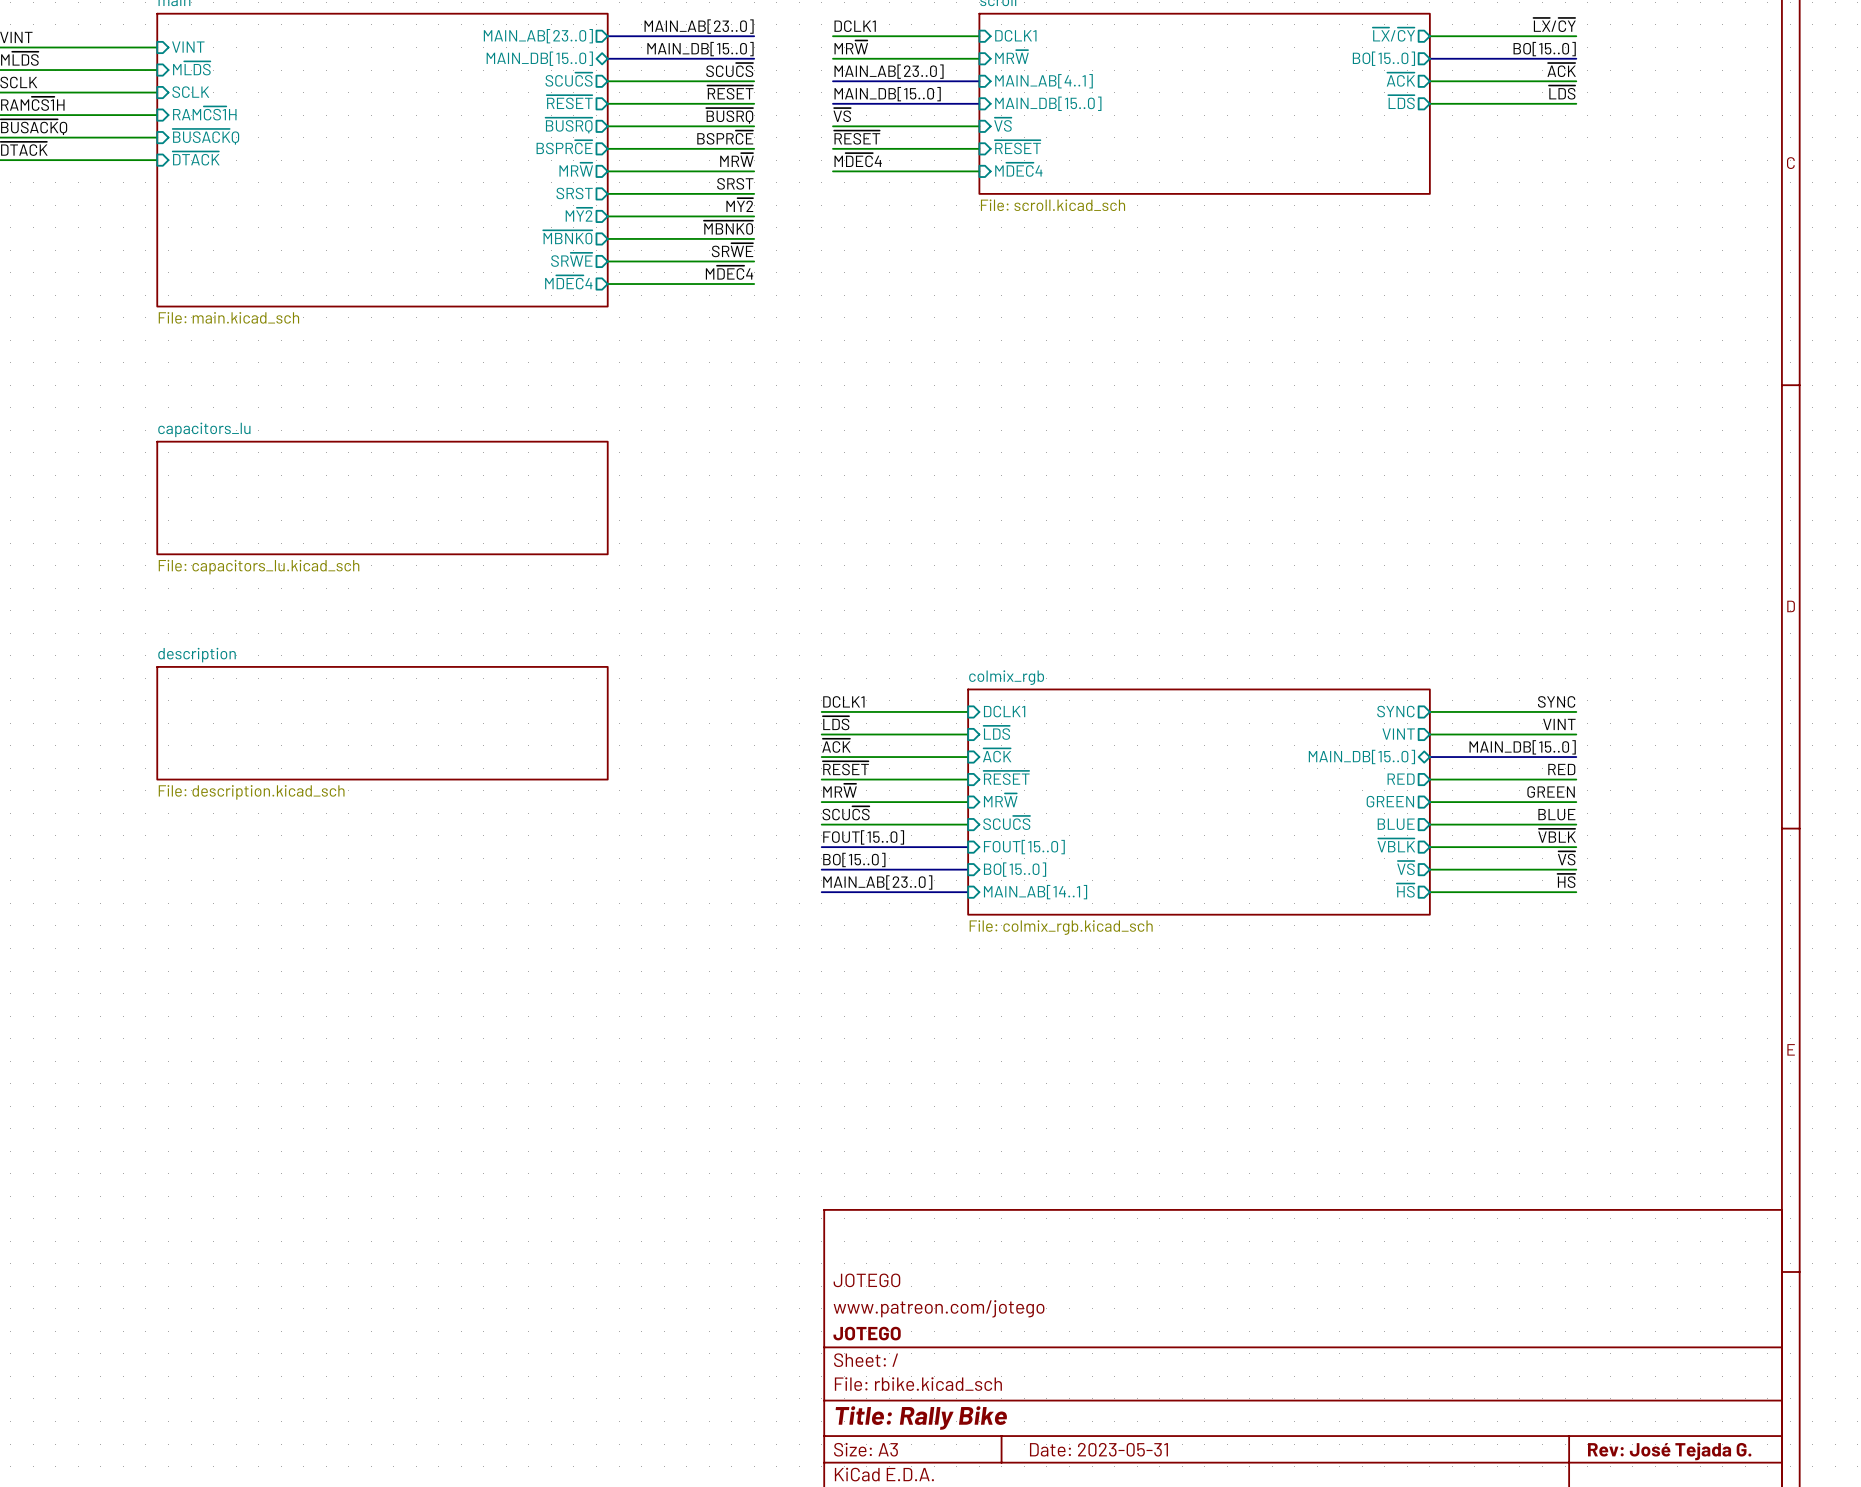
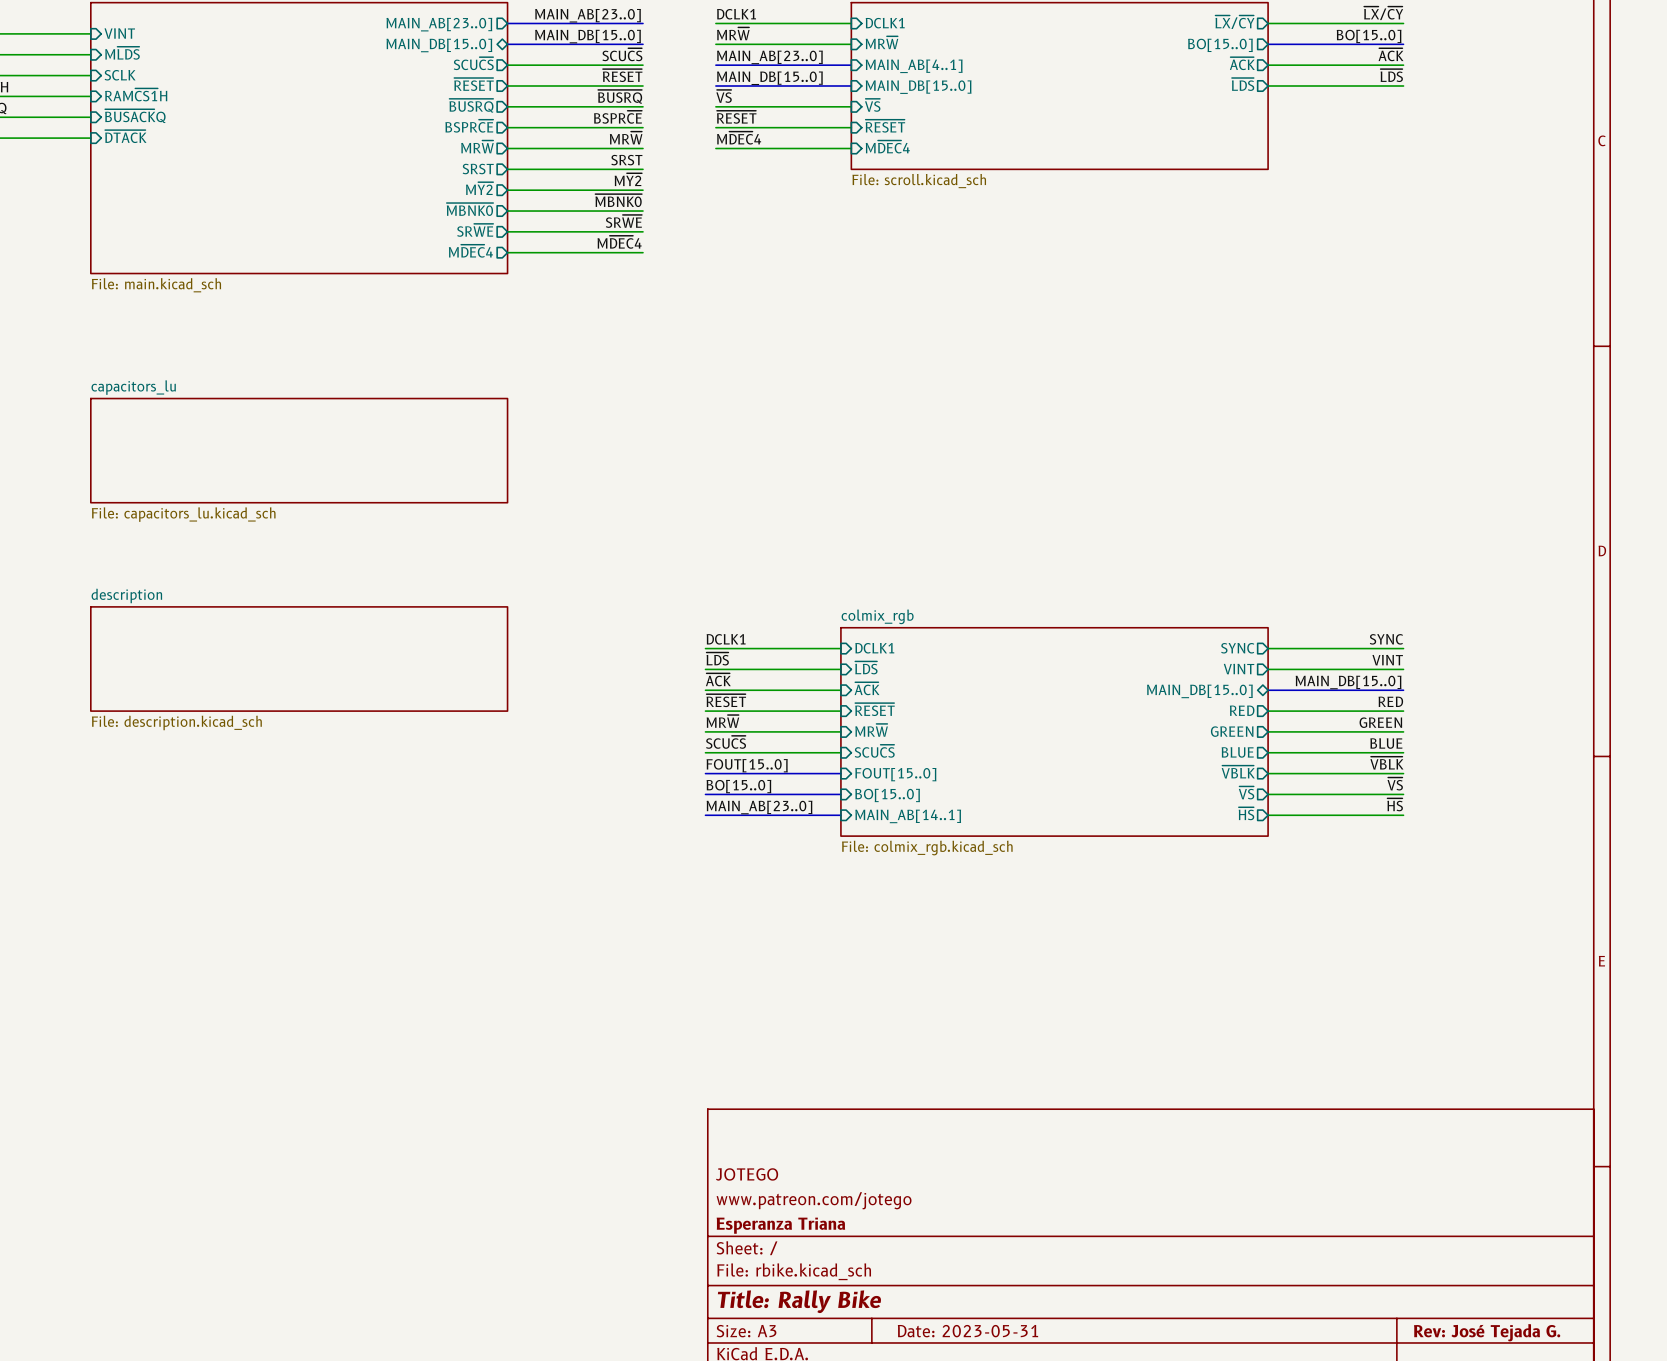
title block: JOTEGO (867, 1333) -> Esperanza Triana (780, 1225)

